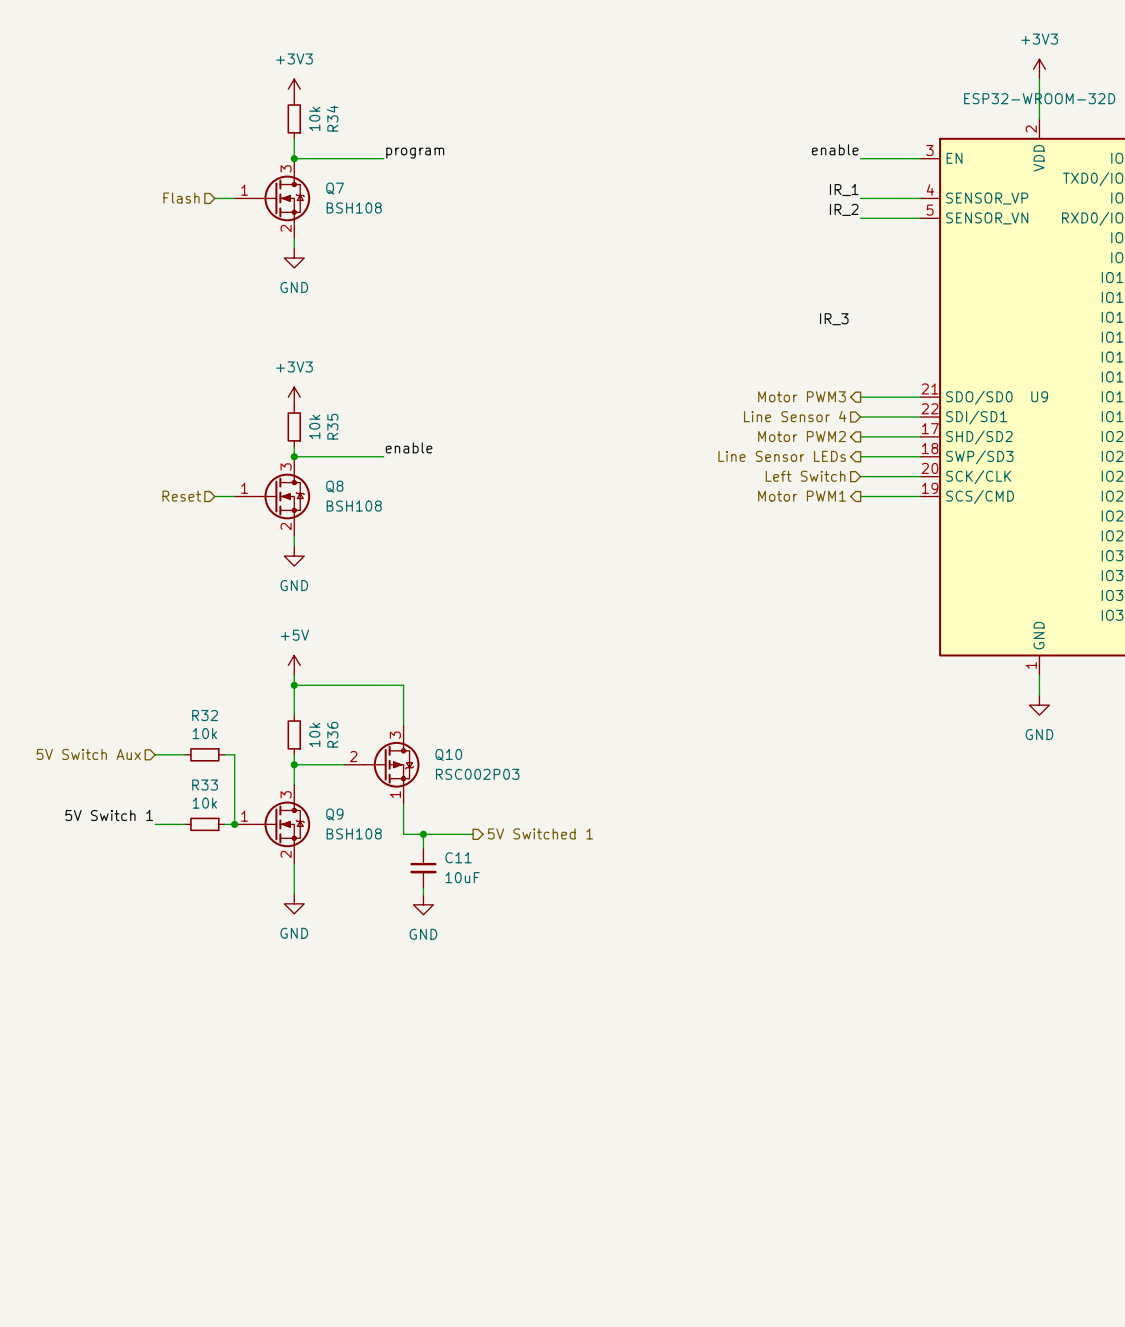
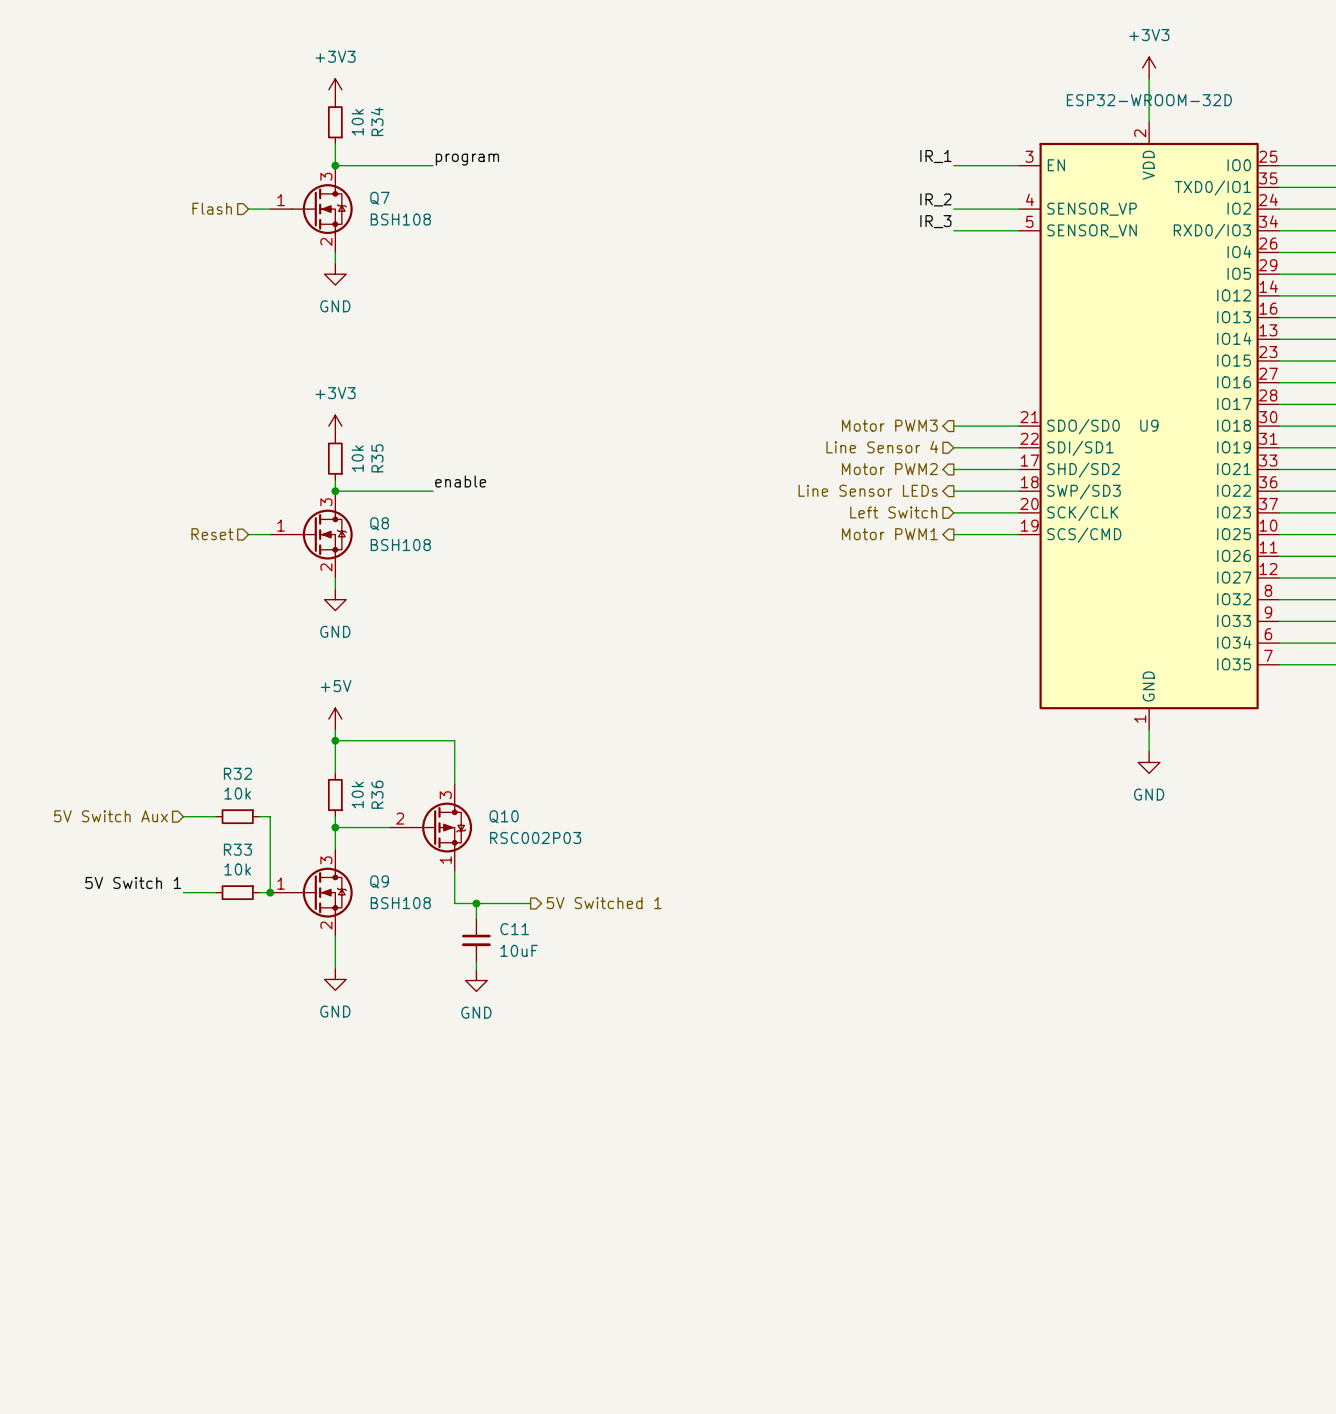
label: enable (835, 149) -> IR_1 (935, 156)
label: IR_1 (844, 190) -> IR_2 (935, 199)
label: IR_2 (844, 209) -> IR_3 (935, 221)
label: IR_3 (834, 319) -> none

